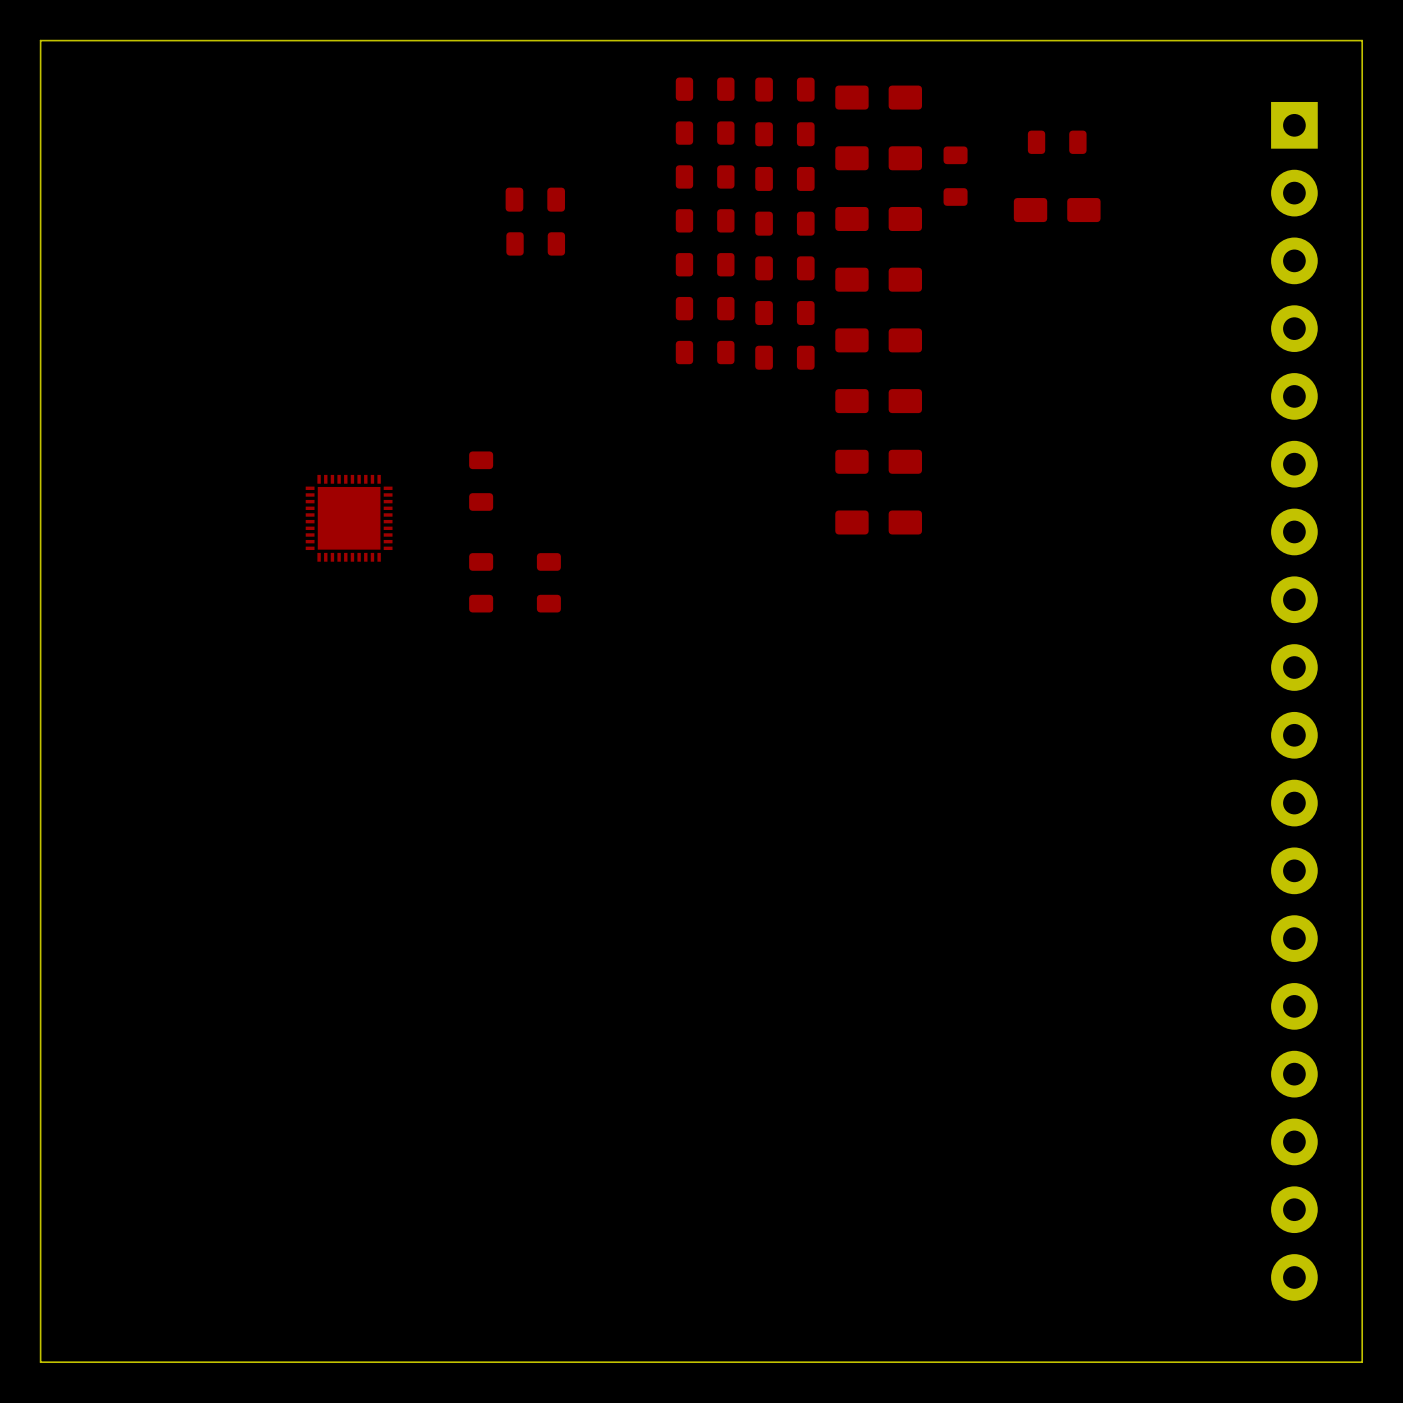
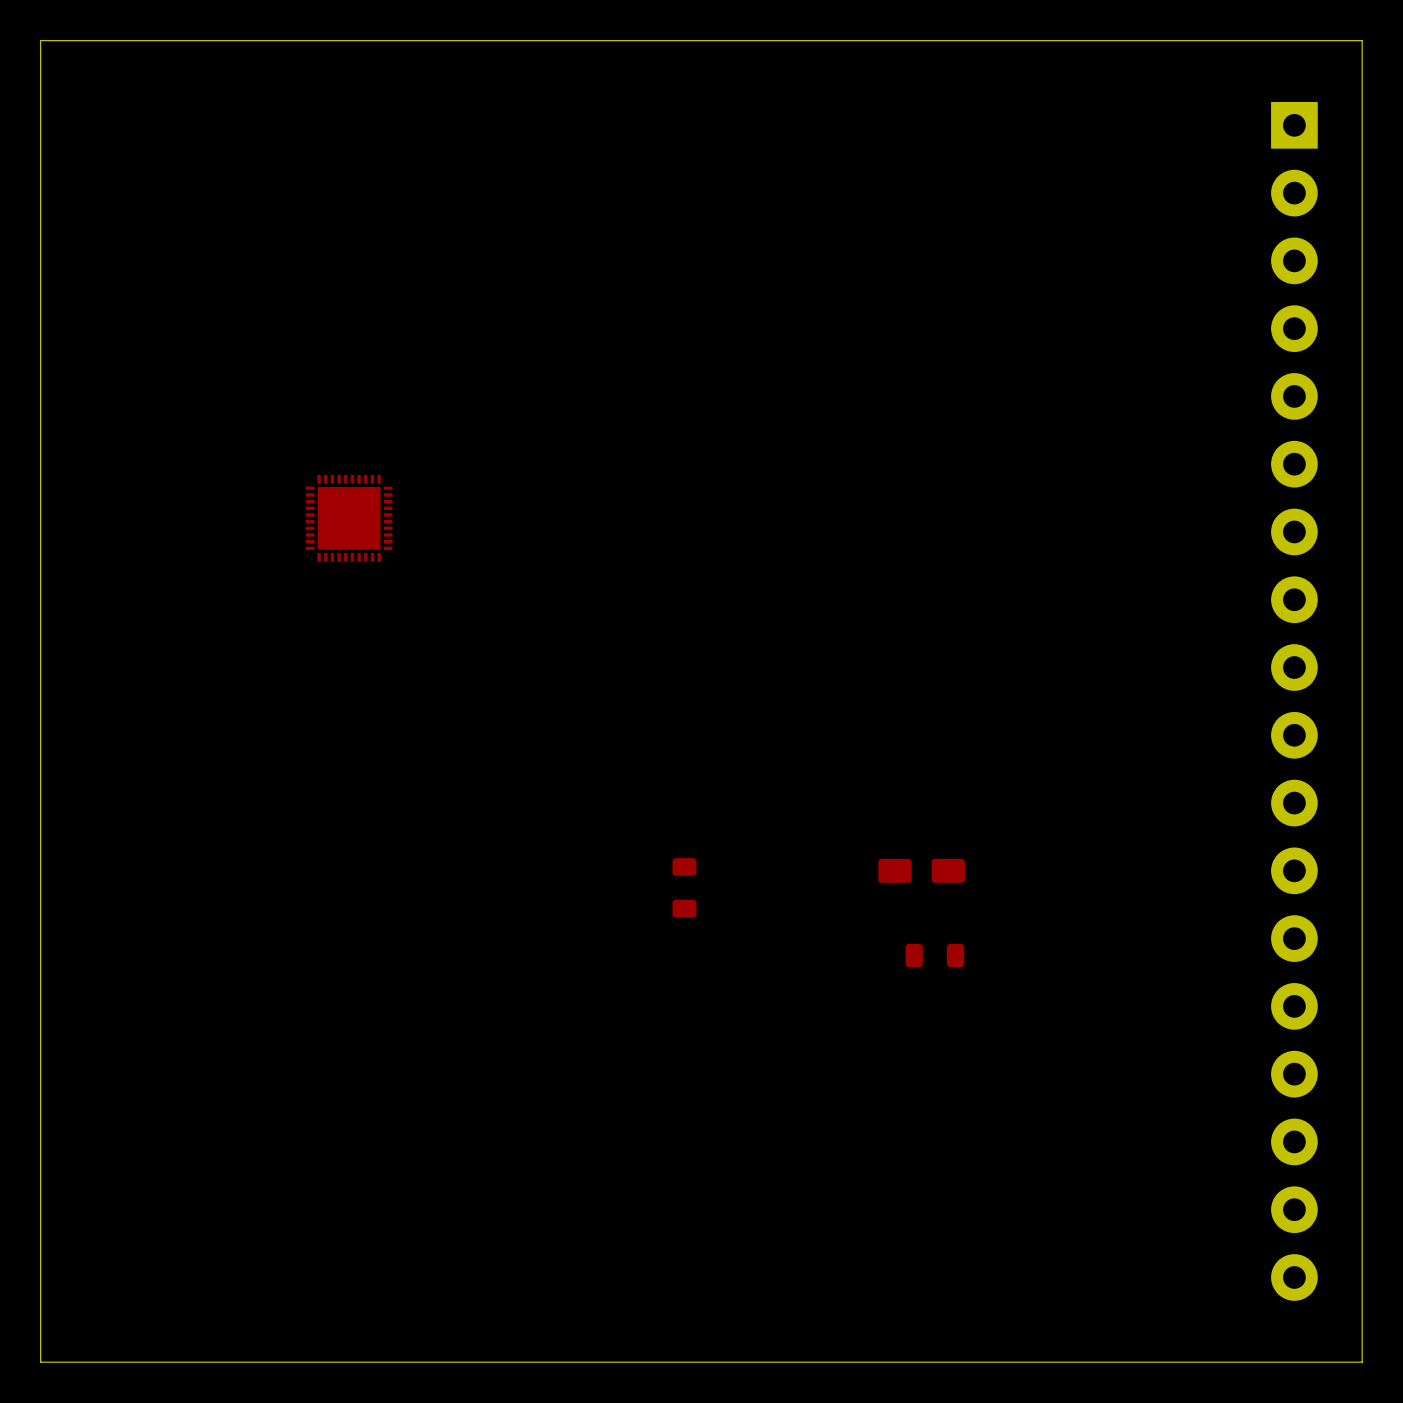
part: (705, 89) -> none
part: (784, 89) -> none
part: (878, 97) -> none
part: (705, 133) -> none
part: (784, 134) -> none
part: (1057, 142) -> none
part: (878, 158) -> none
part: (705, 176) -> none
part: (955, 176) -> none
part: (784, 178) -> none
part: (535, 199) -> none
part: (1057, 210) -> none
part: (878, 218) -> none
part: (705, 220) -> none
part: (784, 223) -> none
part: (535, 243) -> none
part: (705, 264) -> none
part: (784, 268) -> none
part: (878, 279) -> none
part: (705, 308) -> none
part: (784, 313) -> none
part: (878, 340) -> none
part: (705, 352) -> none
part: (784, 357) -> none
part: (878, 401) -> none
part: (878, 461) -> none
part: (481, 481) -> none
part: (878, 522) -> none
part: (481, 582) -> none
part: (548, 582) -> none
part: none -> (921, 870)
part: none -> (684, 887)
part: none -> (934, 955)

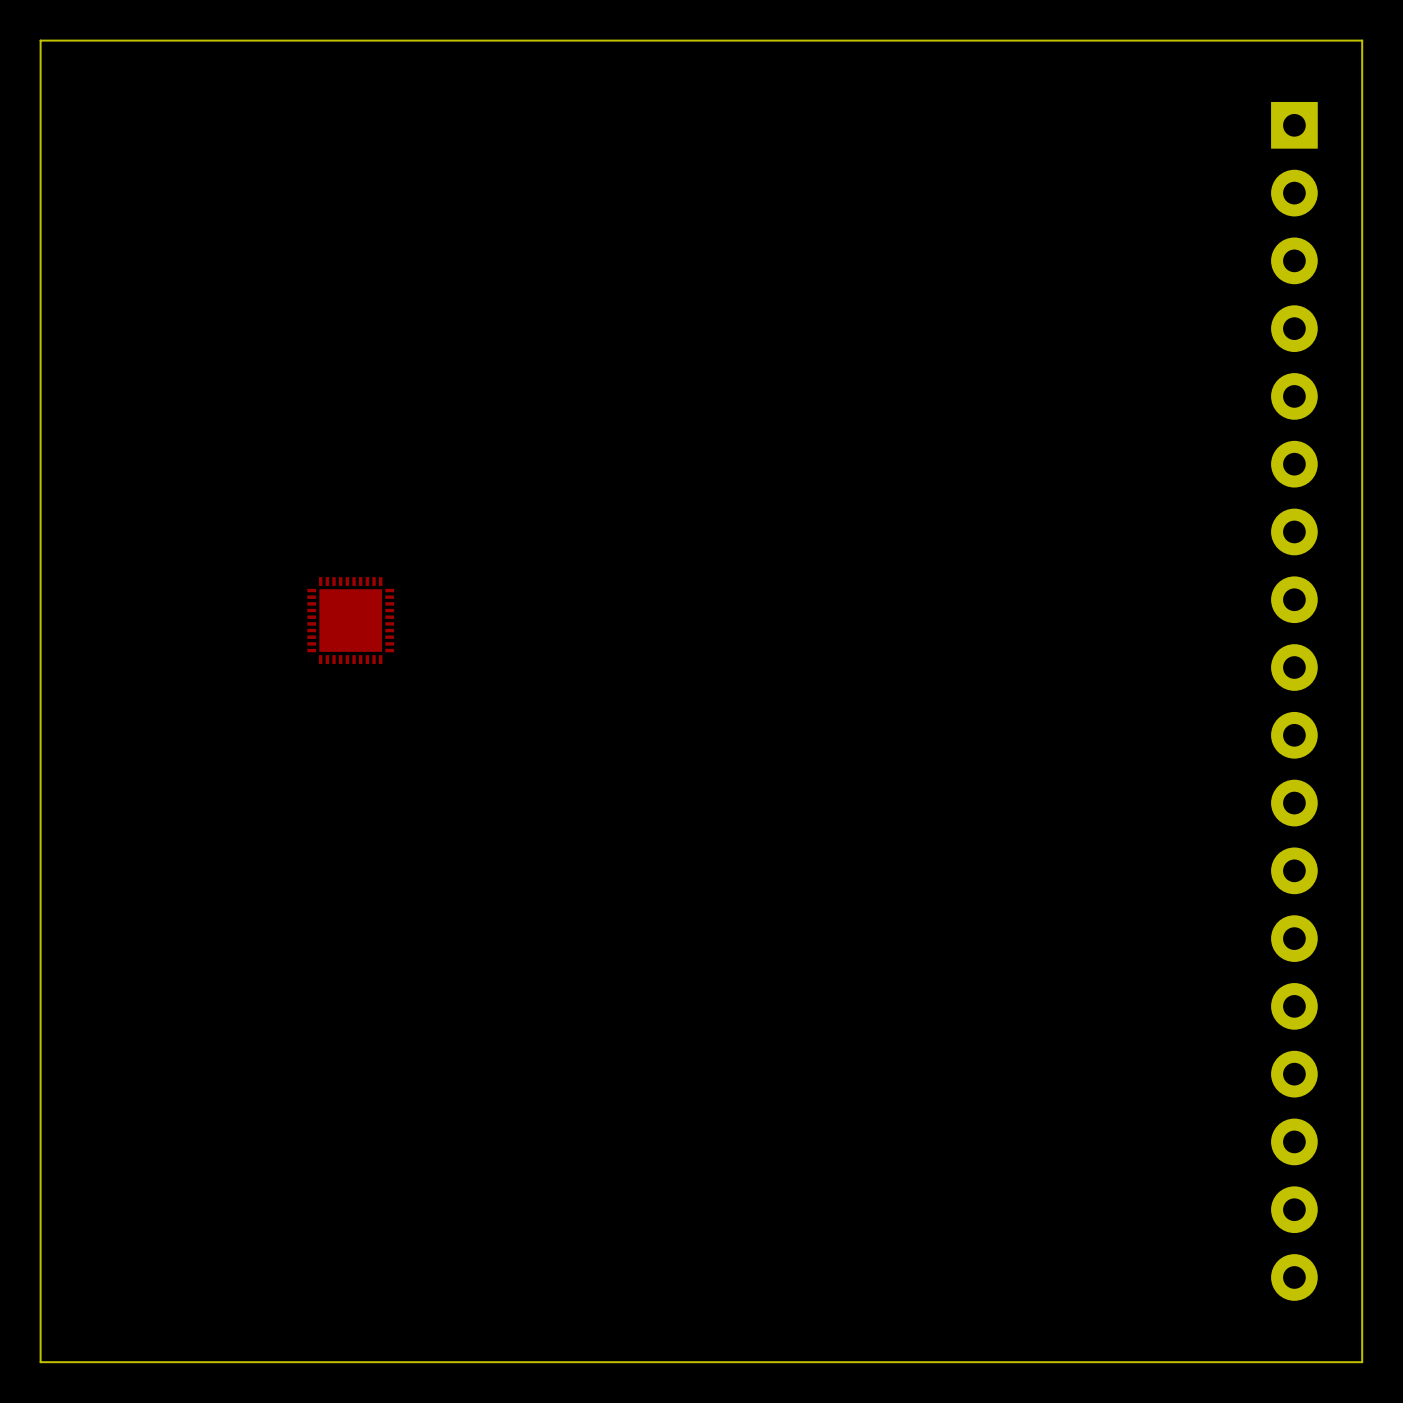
part position: (349, 518) -> (350, 620)
part: (921, 870) -> none
part: (684, 887) -> none
part: (934, 955) -> none

